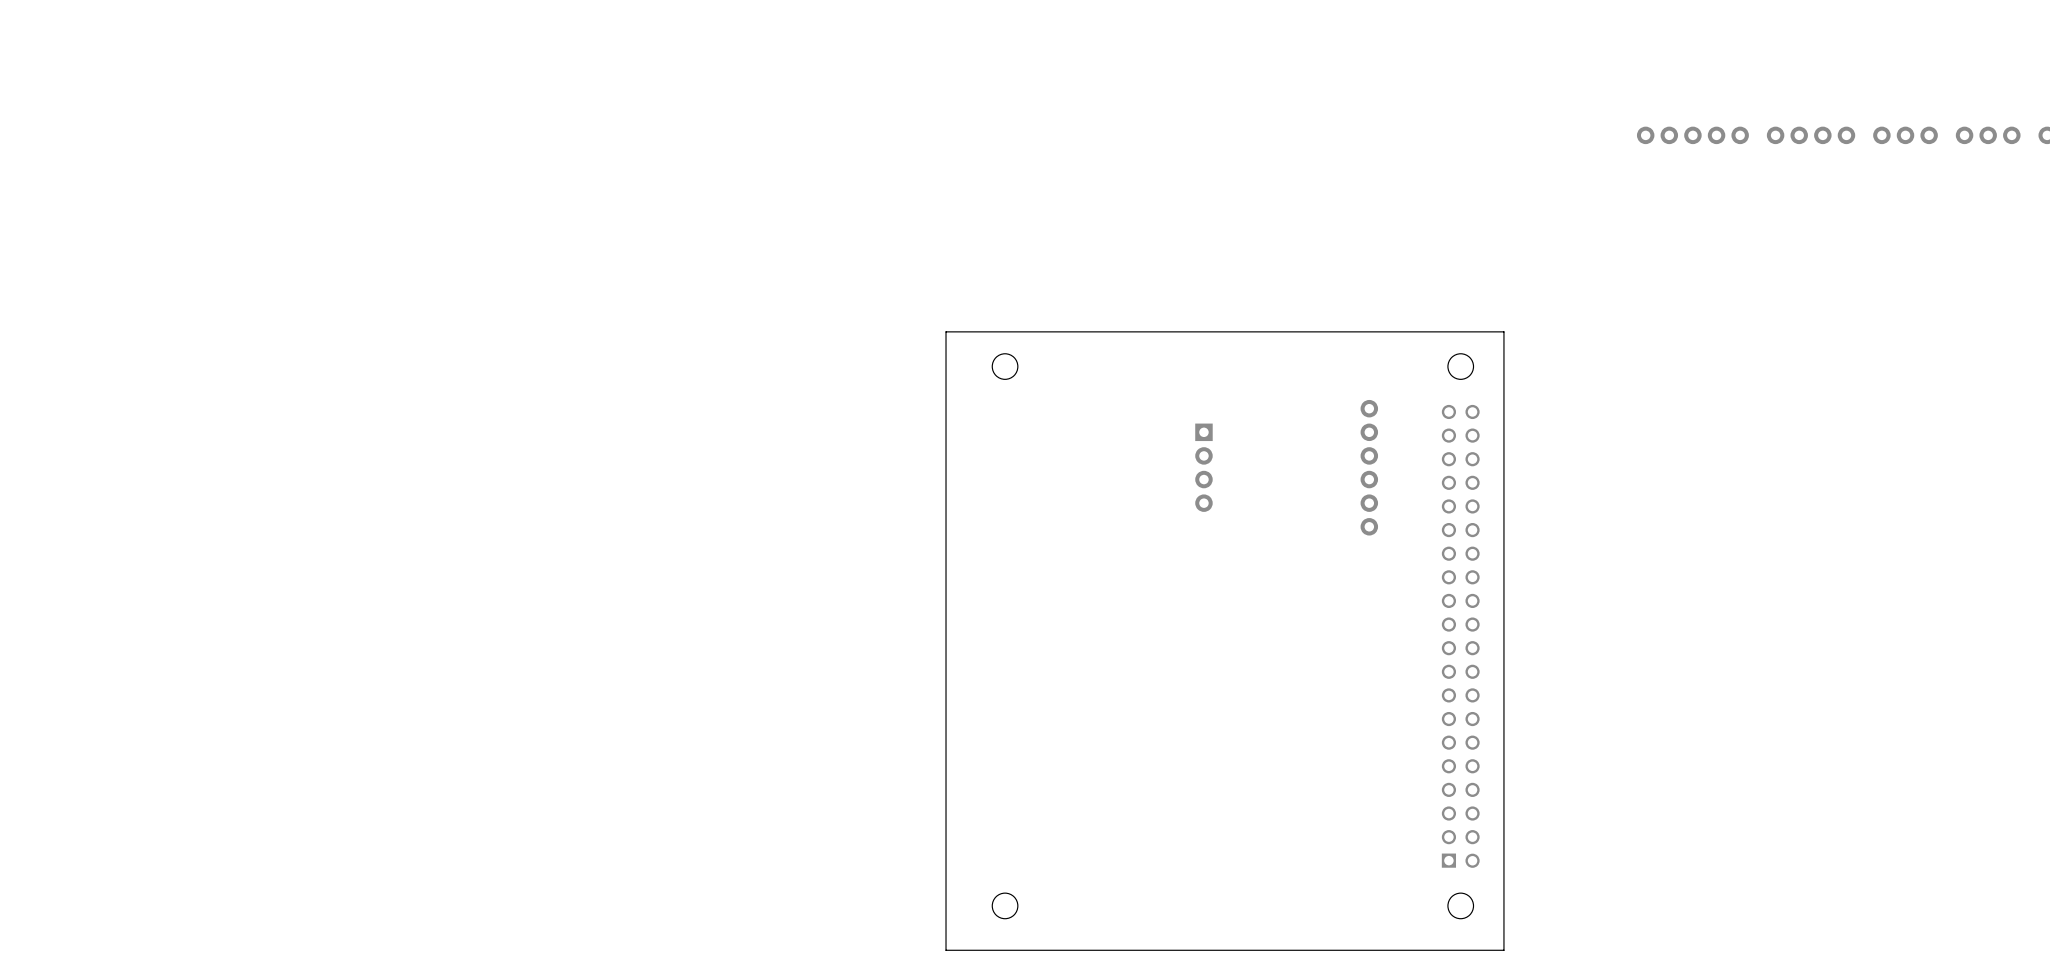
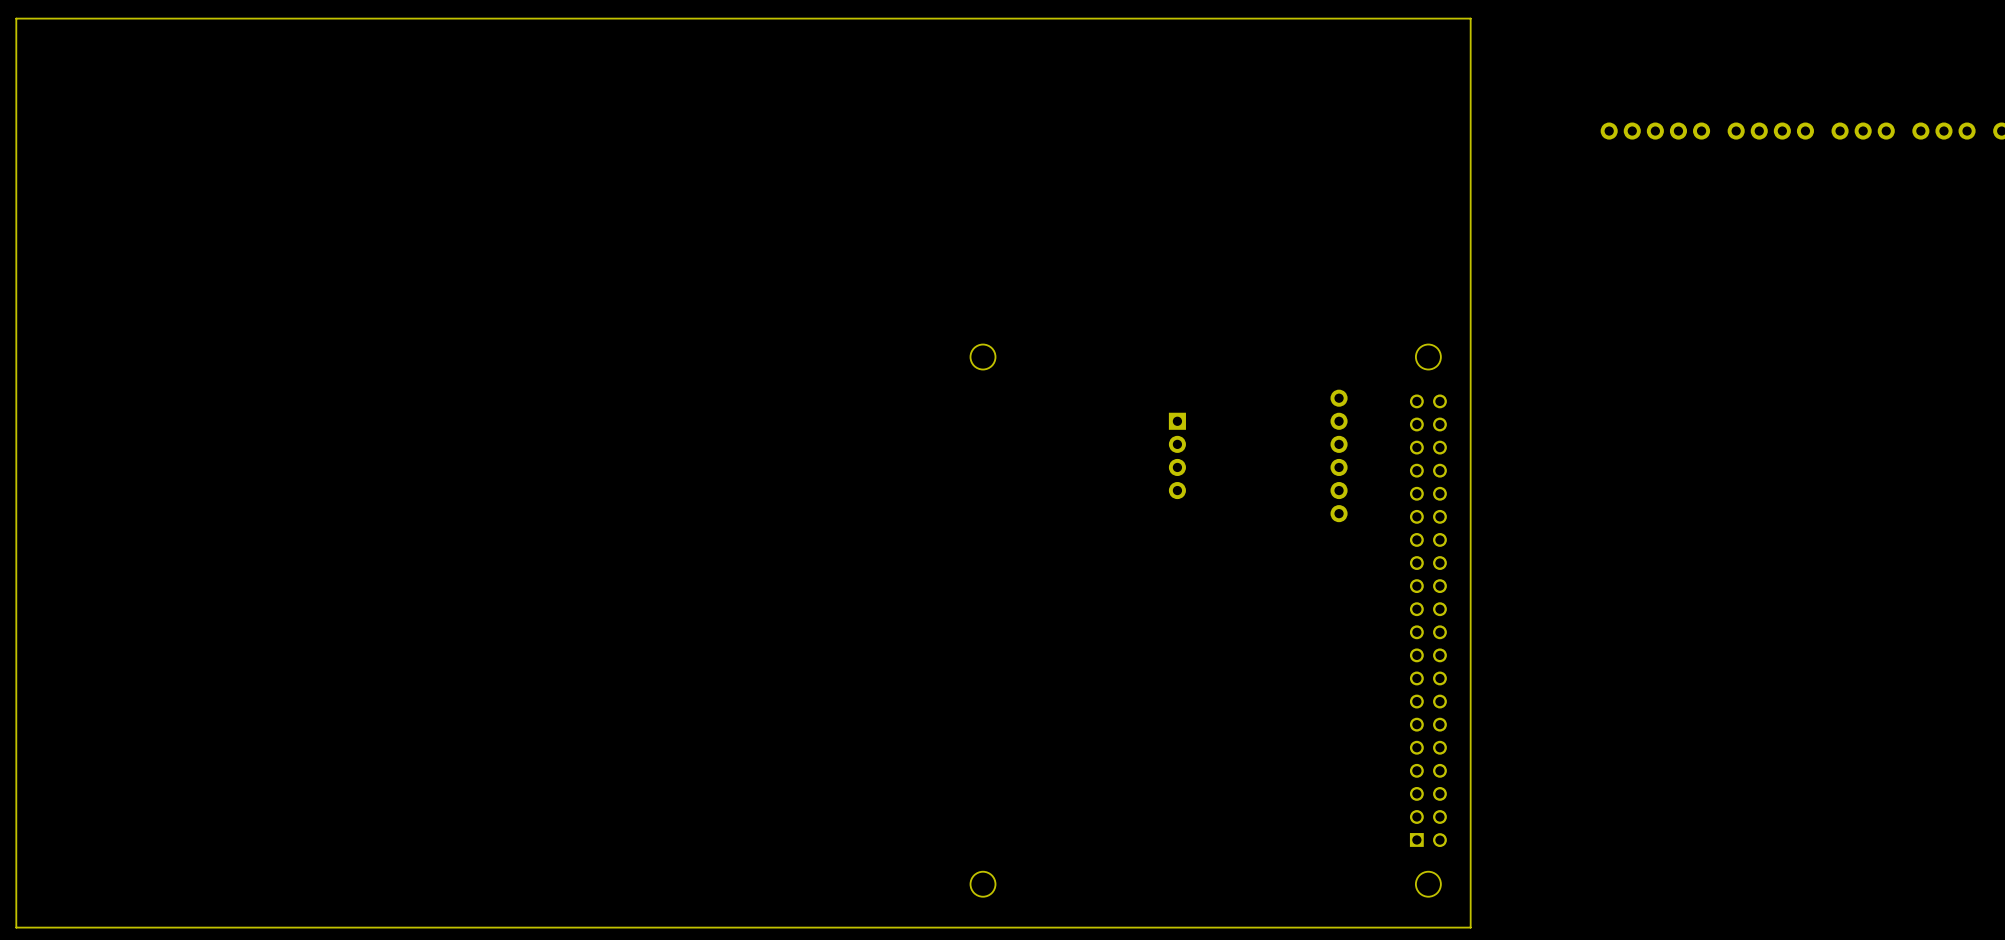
board edge: (1503, 331) (946, 331) (946, 950) -> (1470, 323) (1470, 18) (16, 18) (16, 927) (925, 927)

